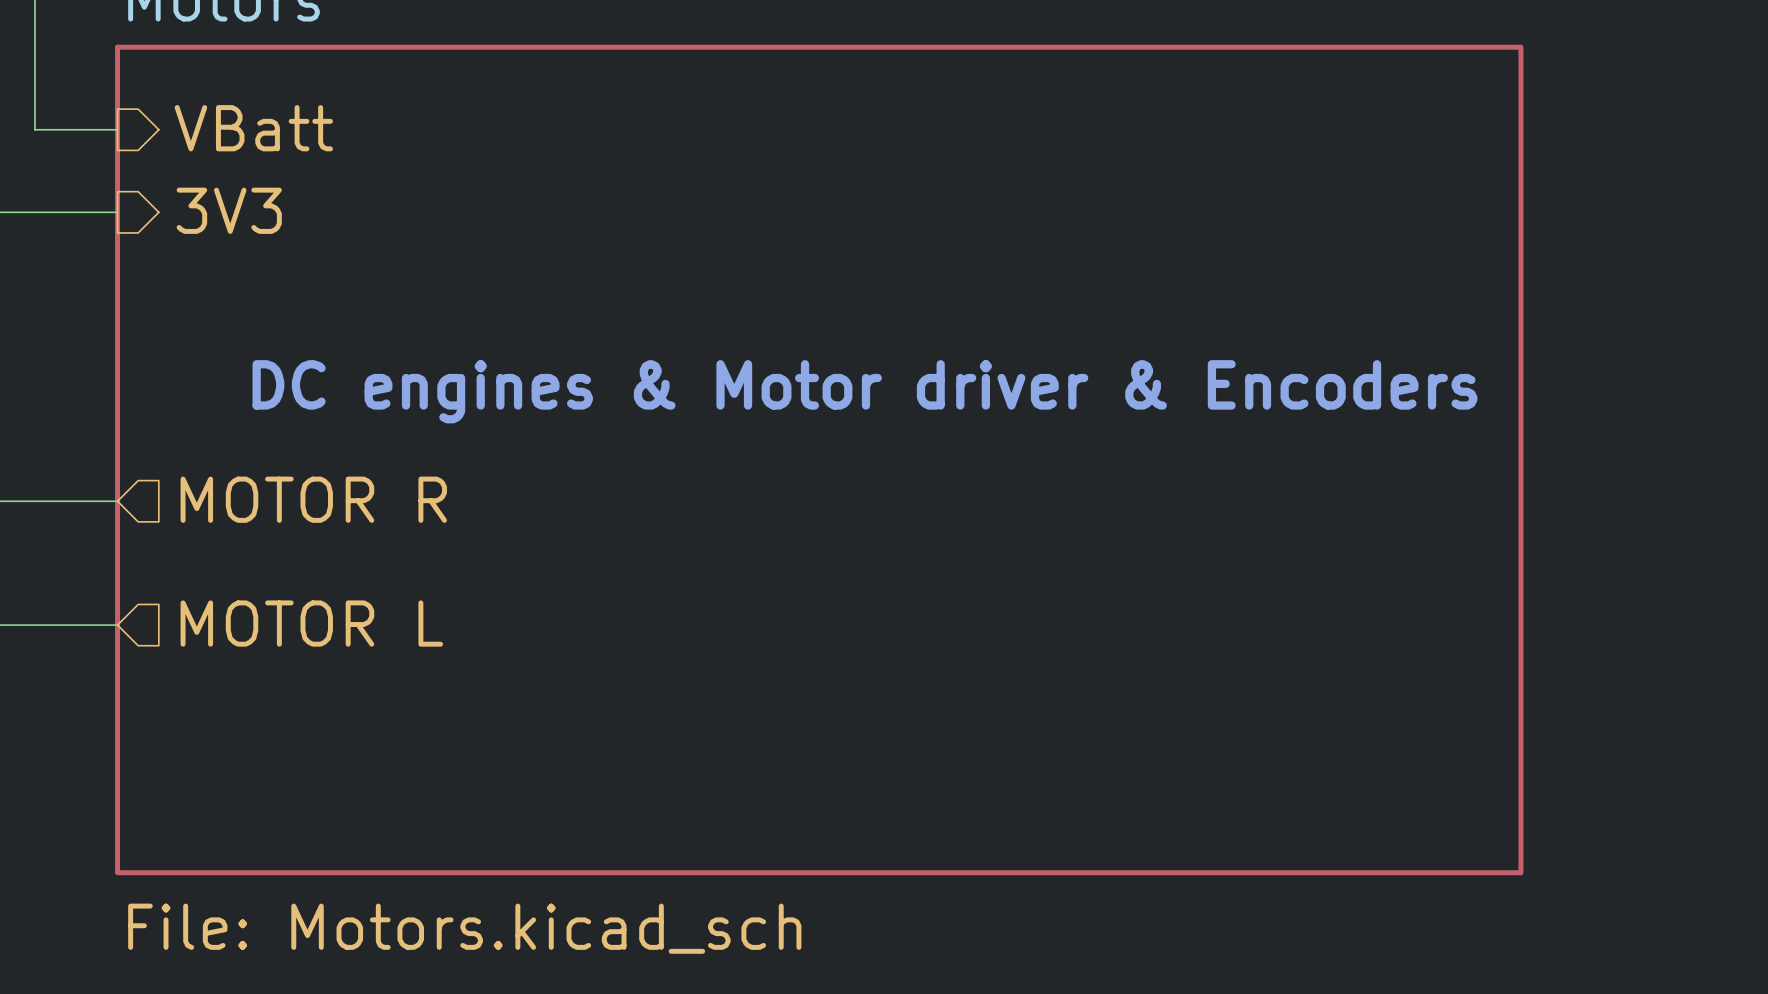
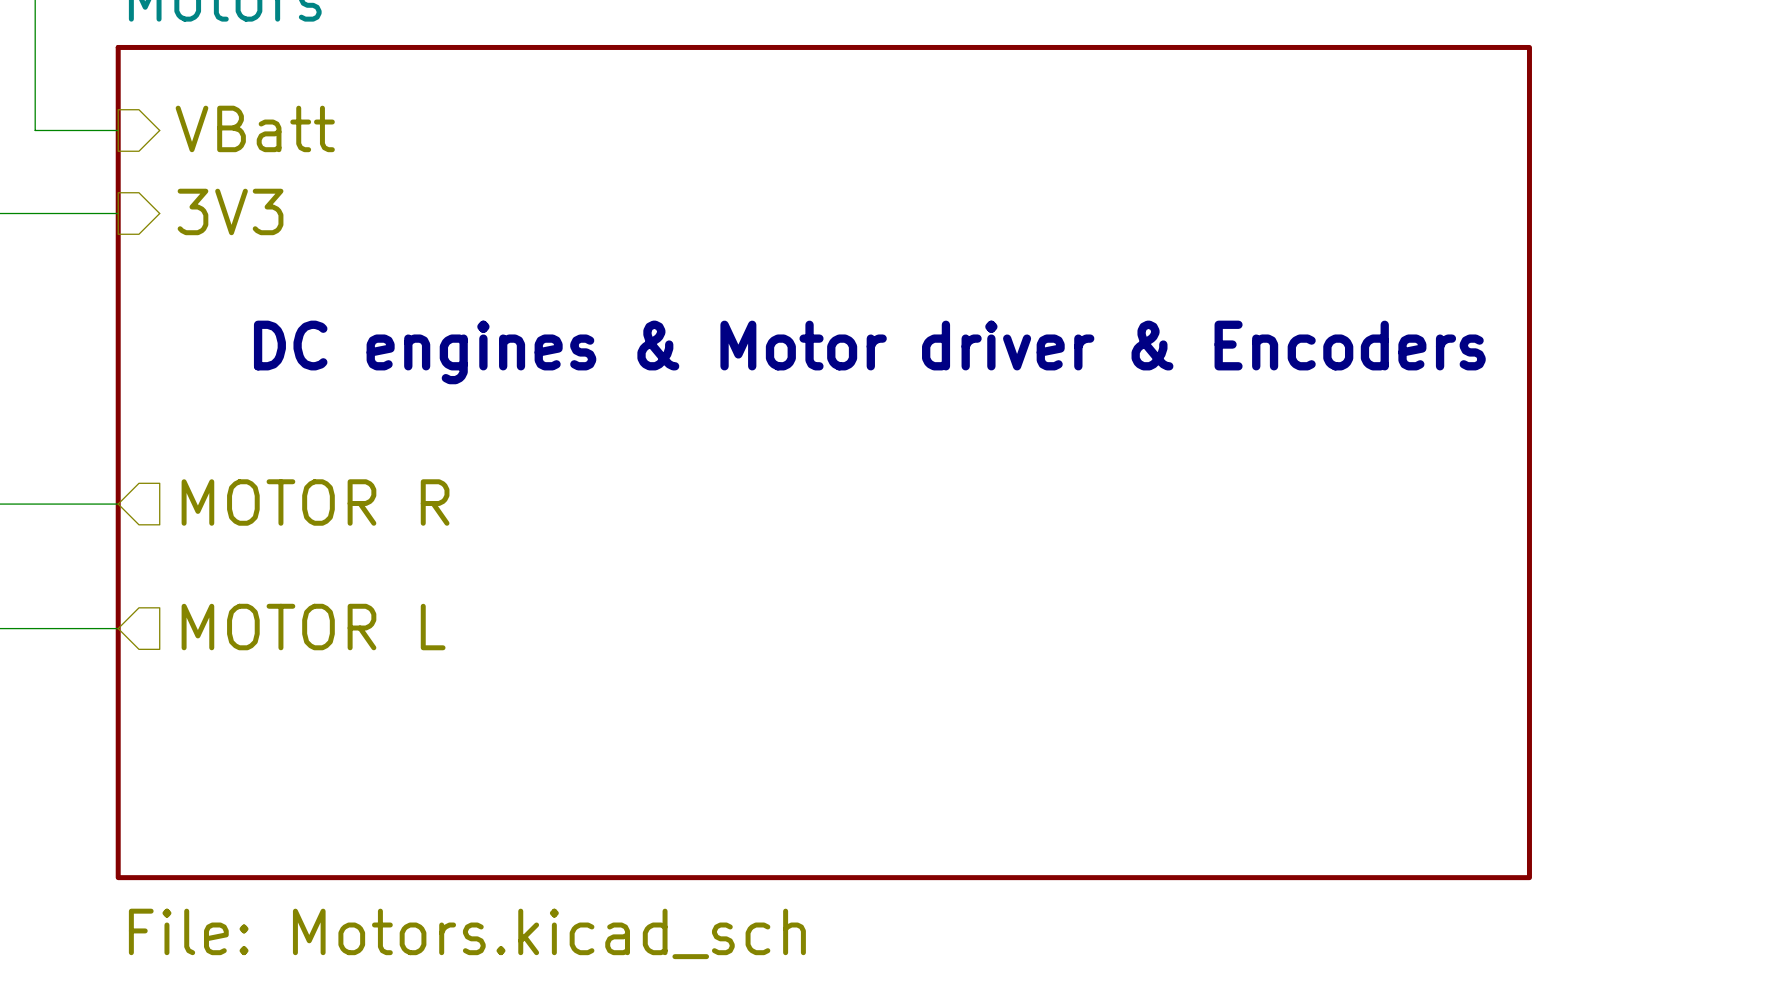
text position: DC engines & Motor driver & Encoders (864, 391) -> DC engines & Motor driver & Encoders (869, 352)

